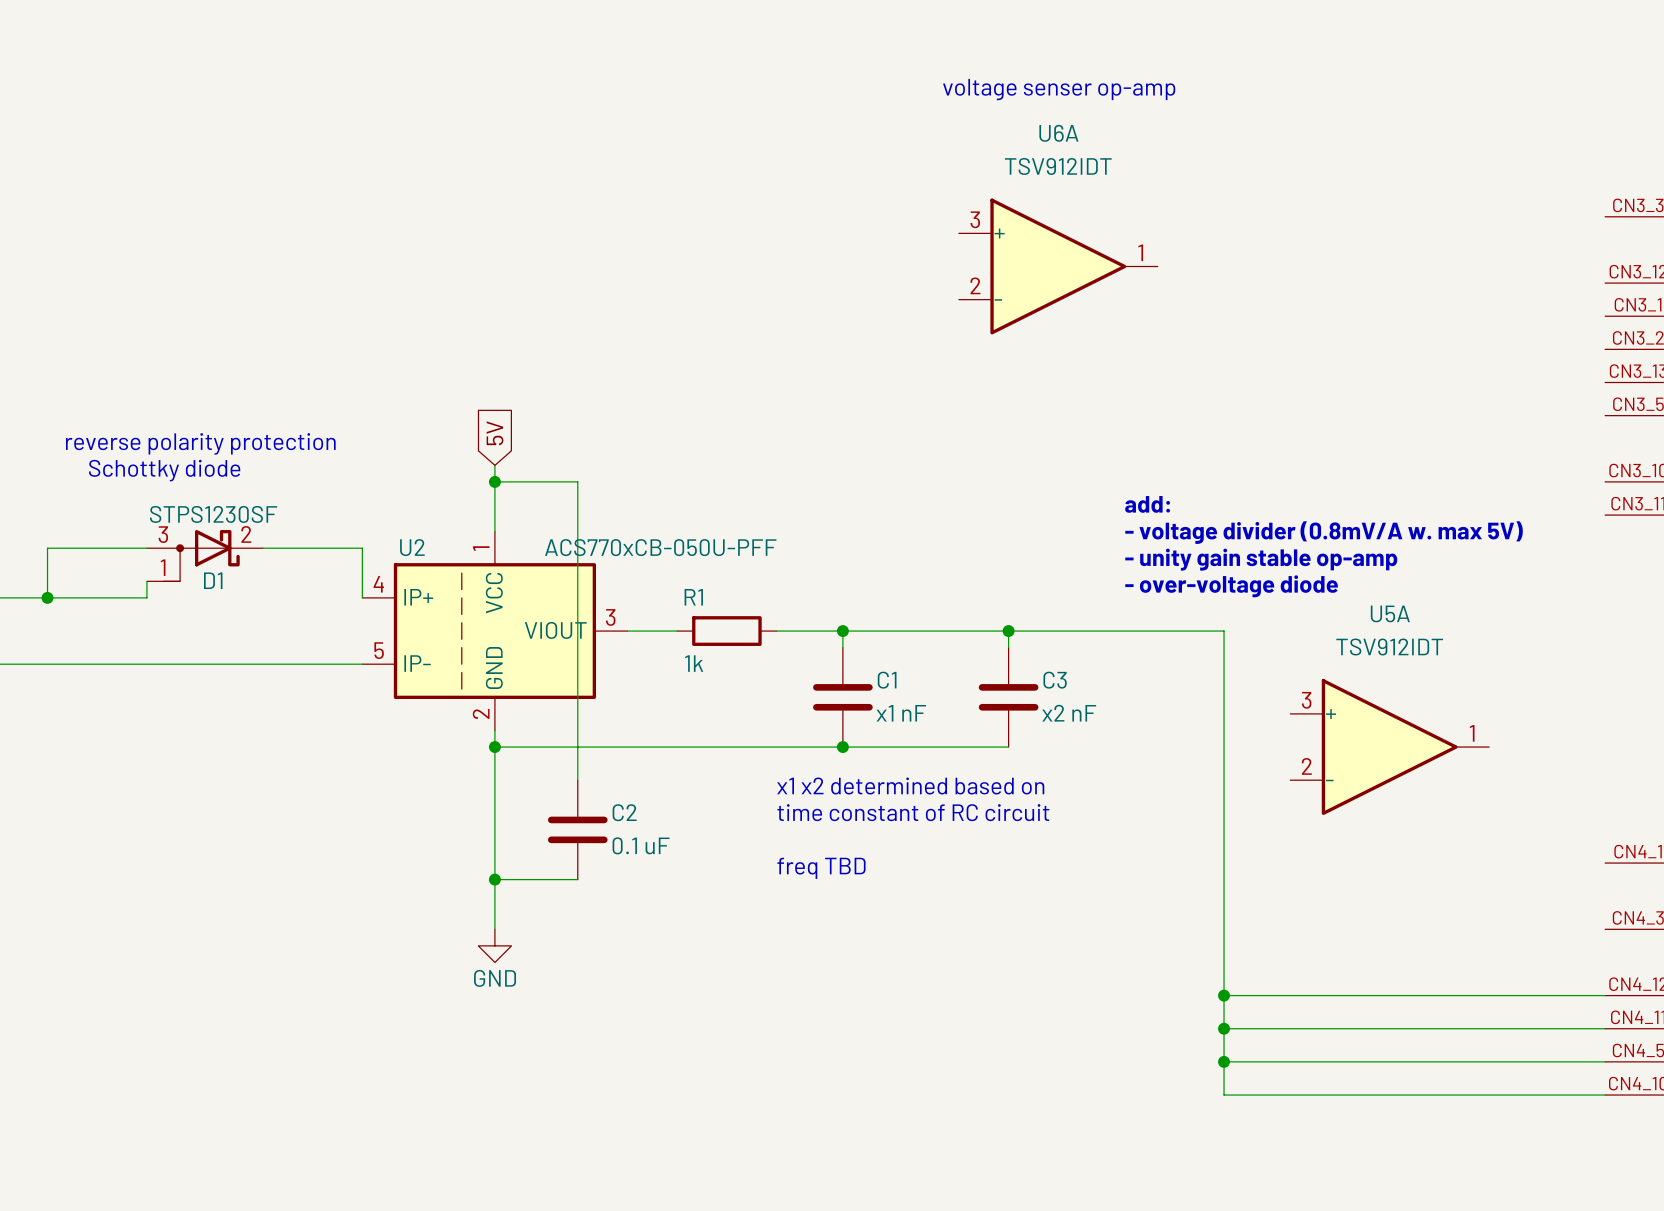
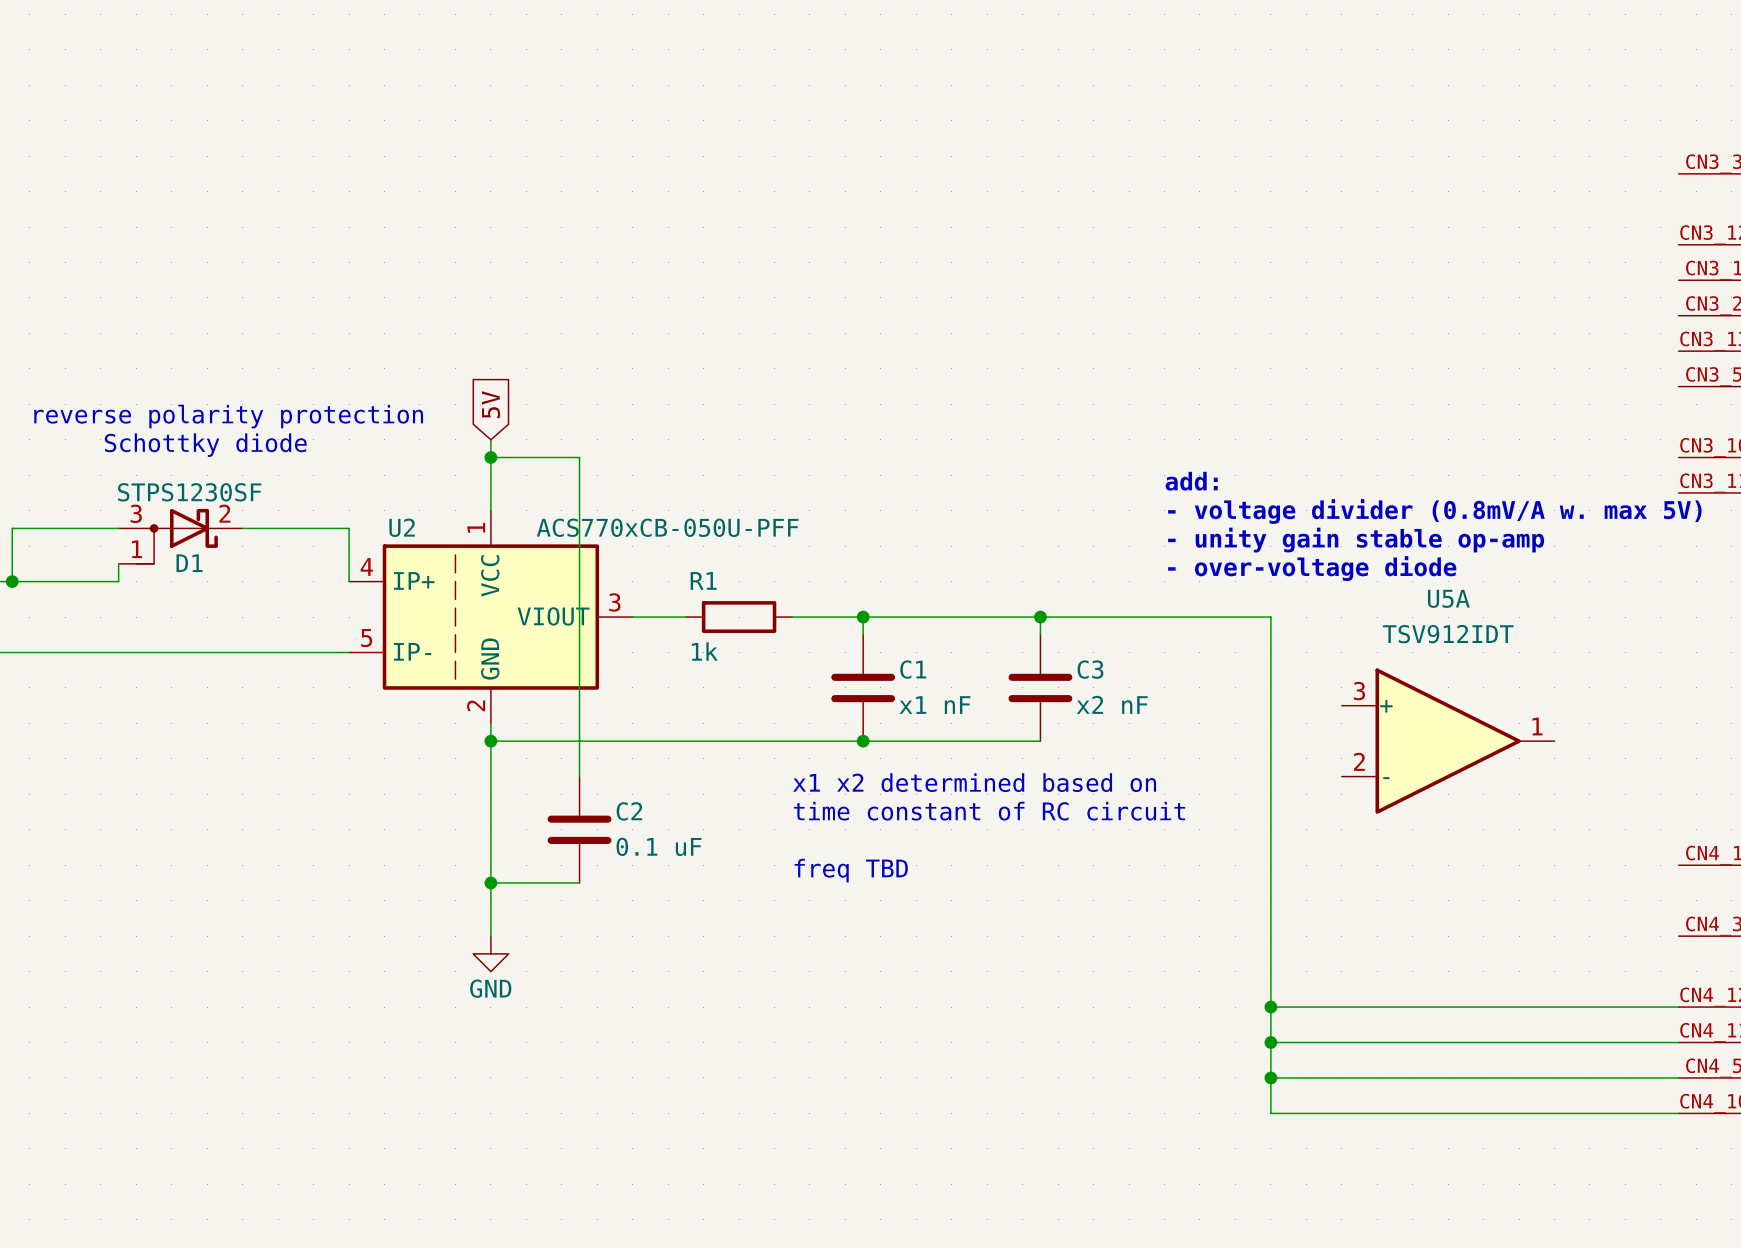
text: voltage senser op-amp (1059, 89) -> none
U6A: TSV912IDT (1058, 266) -> none

